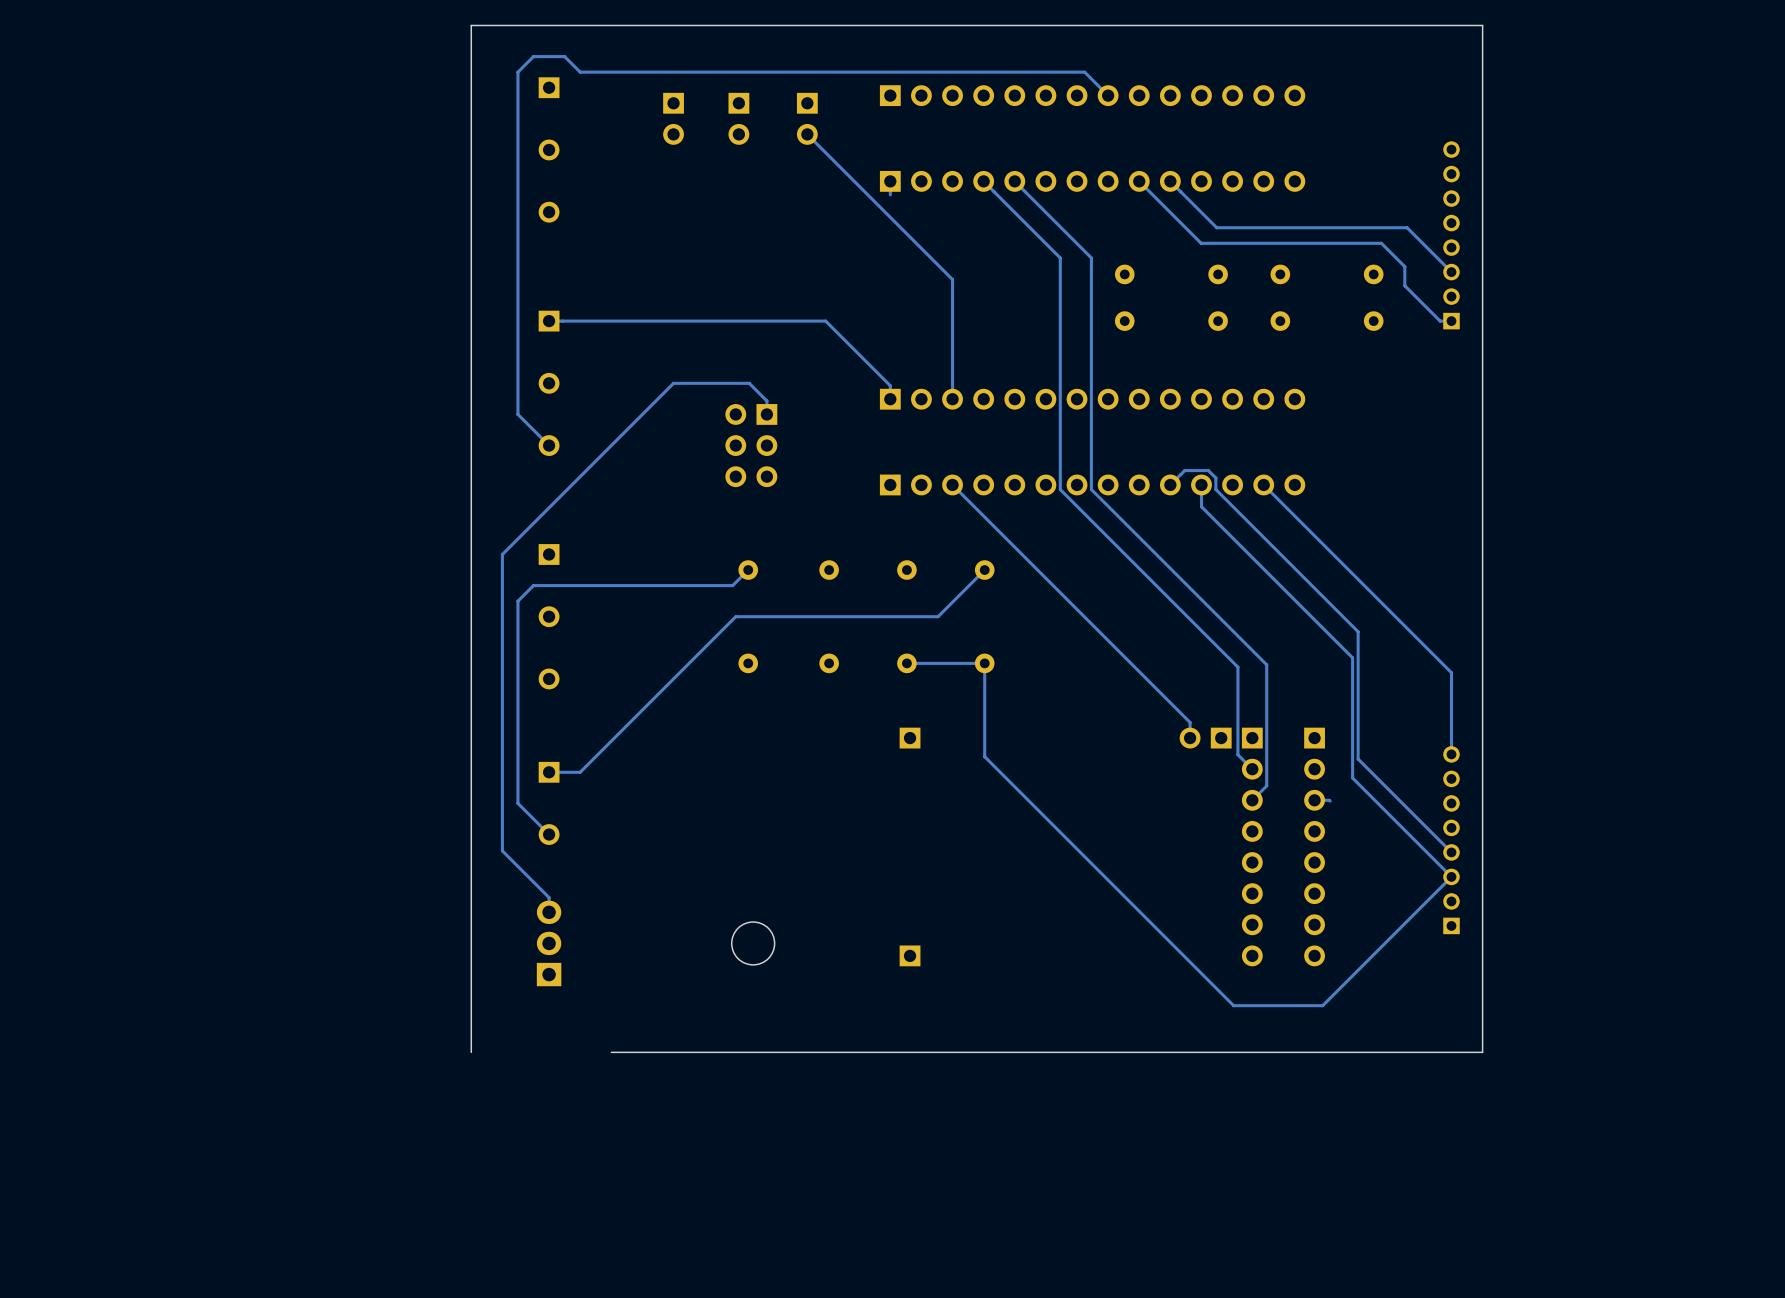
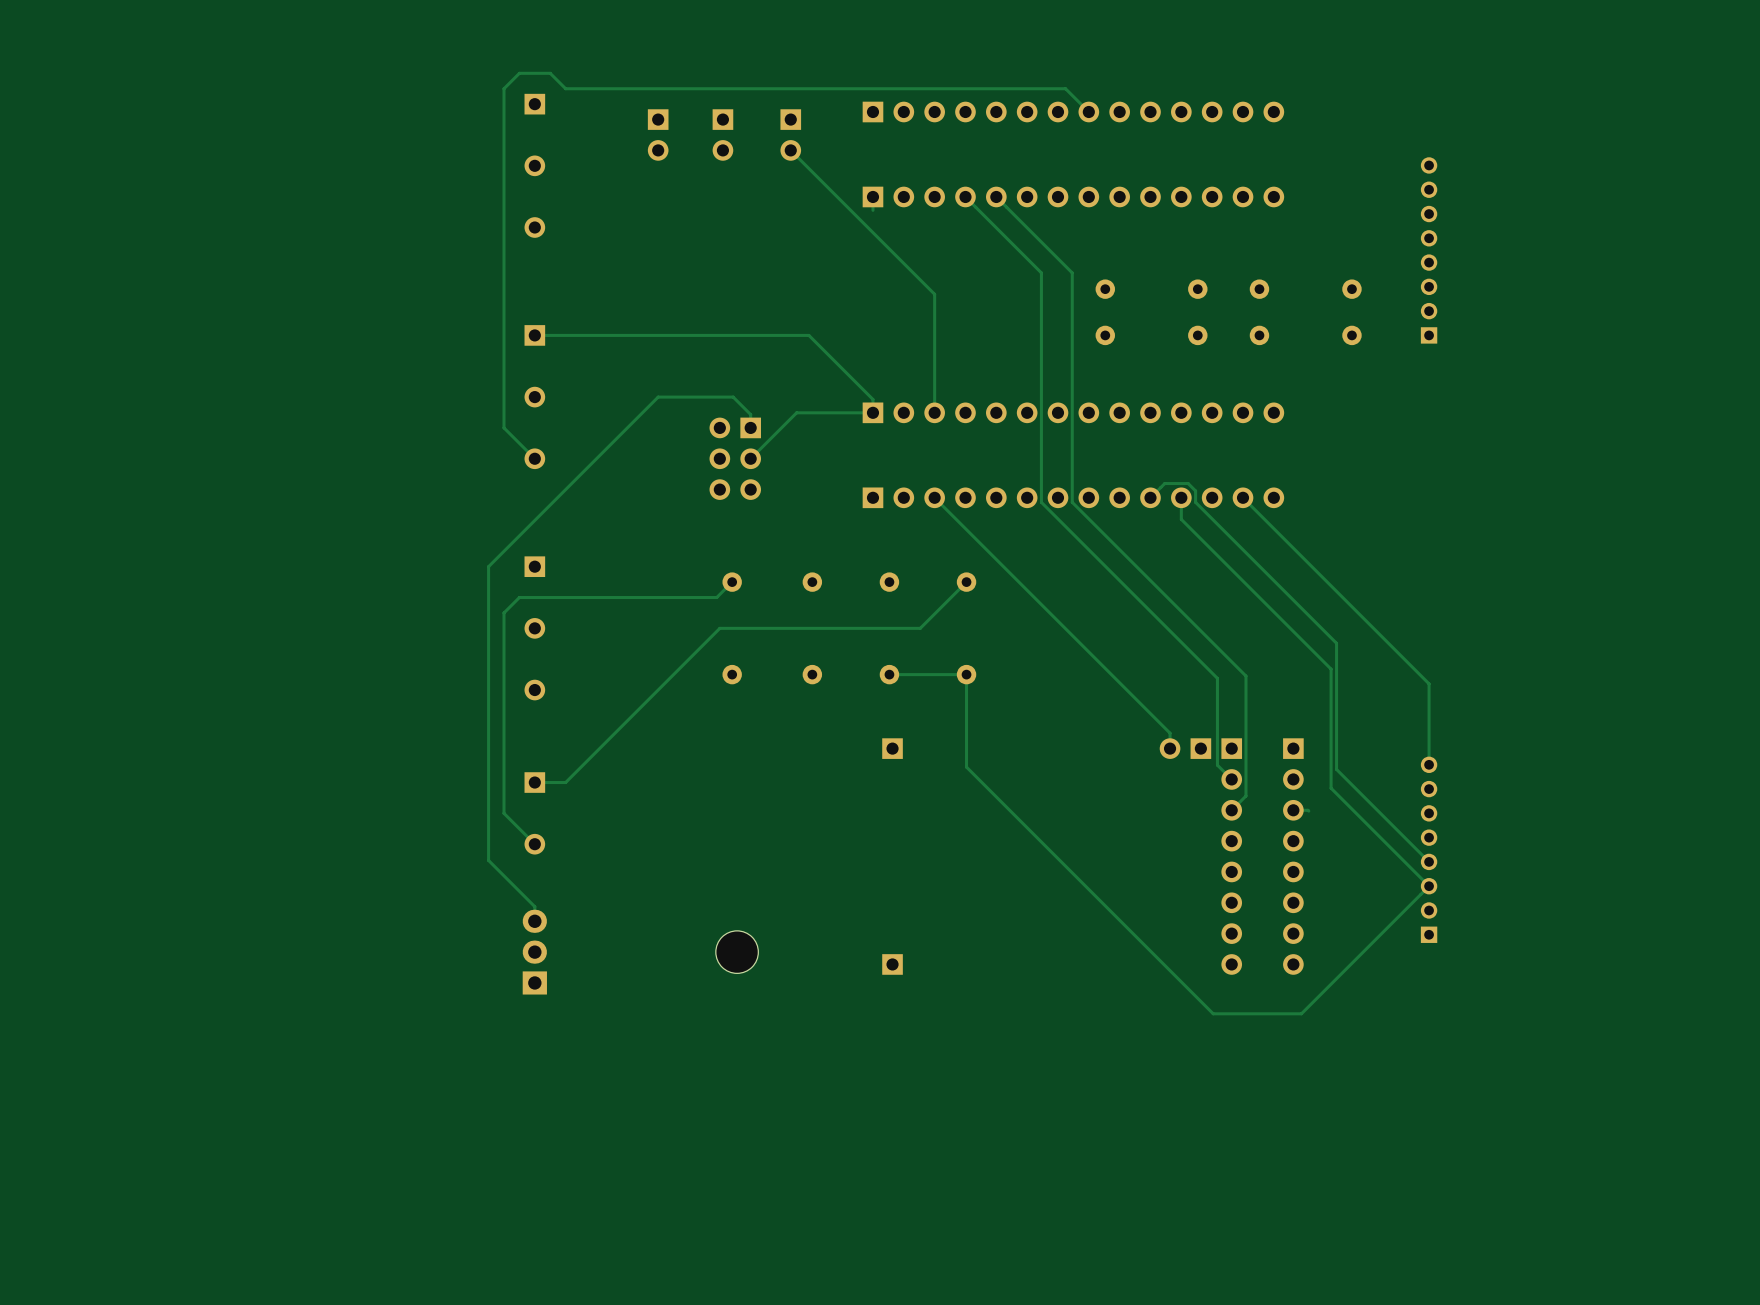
track: (1139, 181) (1201, 243) (1381, 243) (1404, 266) (1404, 285) (1440, 321) (1451, 321) -> none
track: (1170, 181) (1216, 227) (1407, 227) (1451, 272) -> none
track: none -> (872, 412) (796, 412) (750, 458)
board edge: (611, 1052) (1482, 1052) (1482, 25) (471, 25) (471, 1052) -> none

